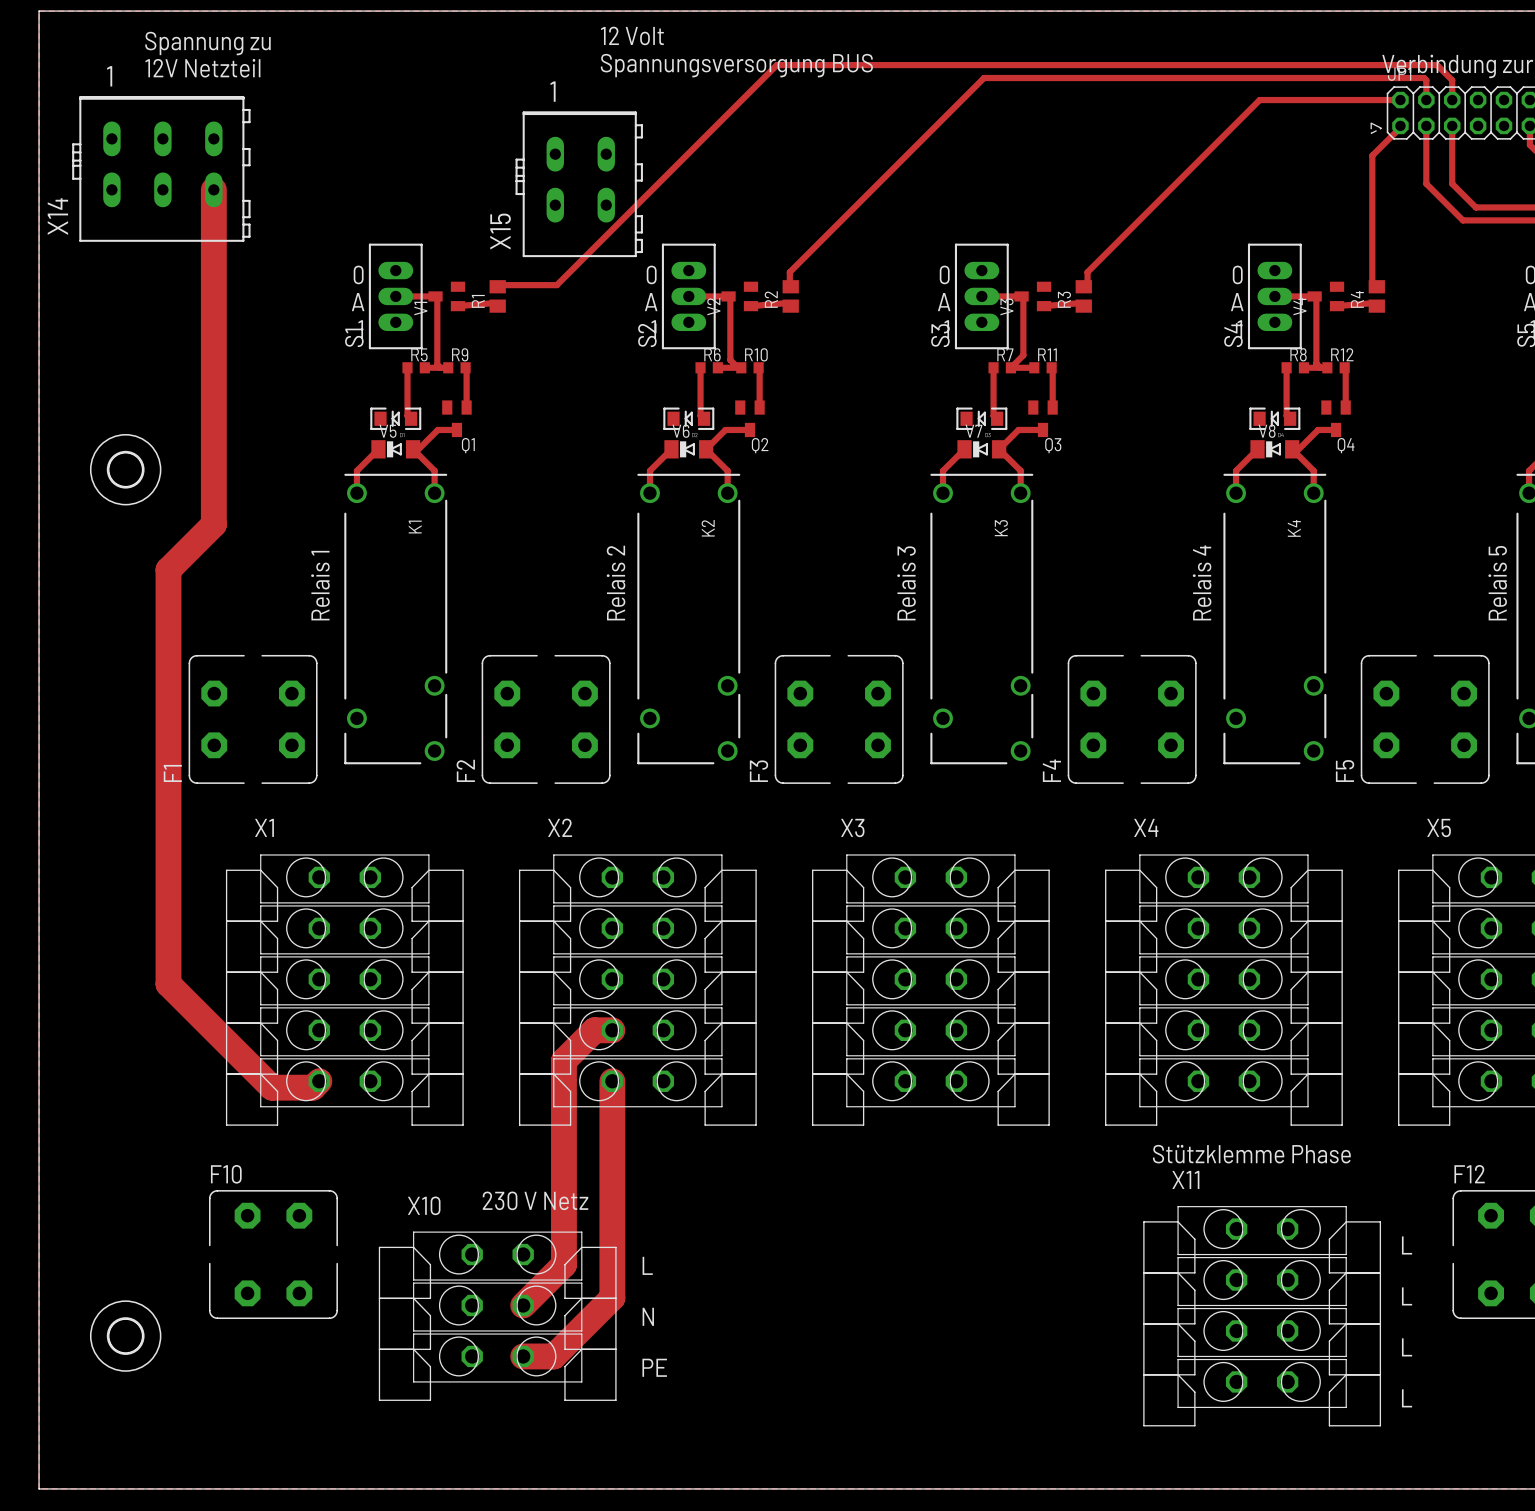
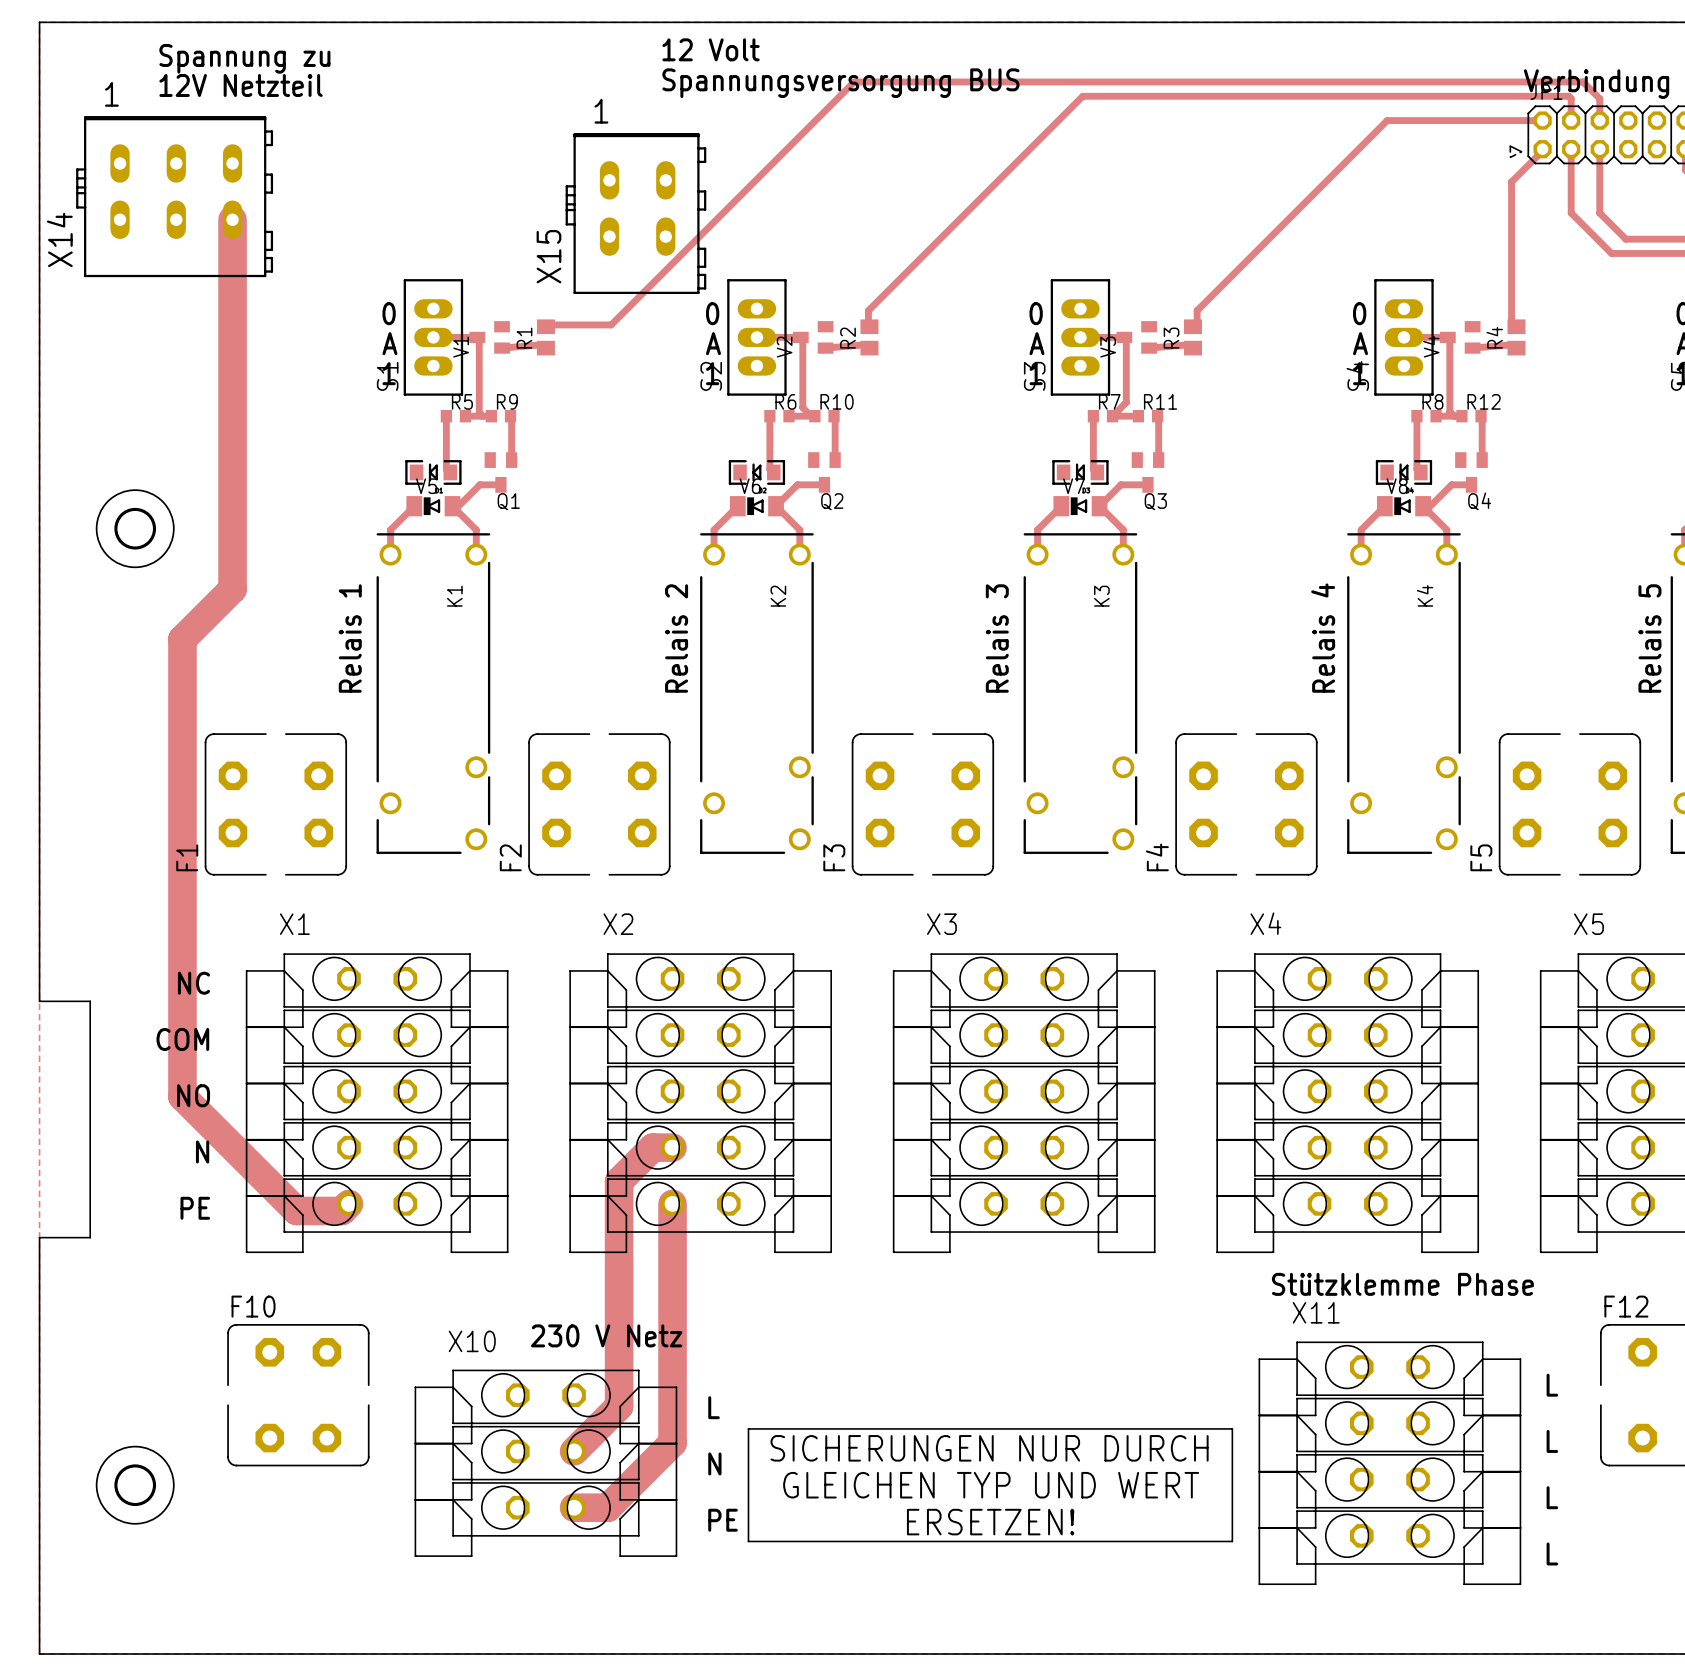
text: none -> NC (193, 983)
board edge: (39, 897) (39, 1111) -> (39, 1001) (90, 1001) (90, 1237) (39, 1237)
text: none -> COM (182, 1039)
text: none -> NO (193, 1095)
text: none -> N (202, 1152)
text: none -> PE (195, 1208)
drawing: none -> [747, 1428, 1234, 1543]

